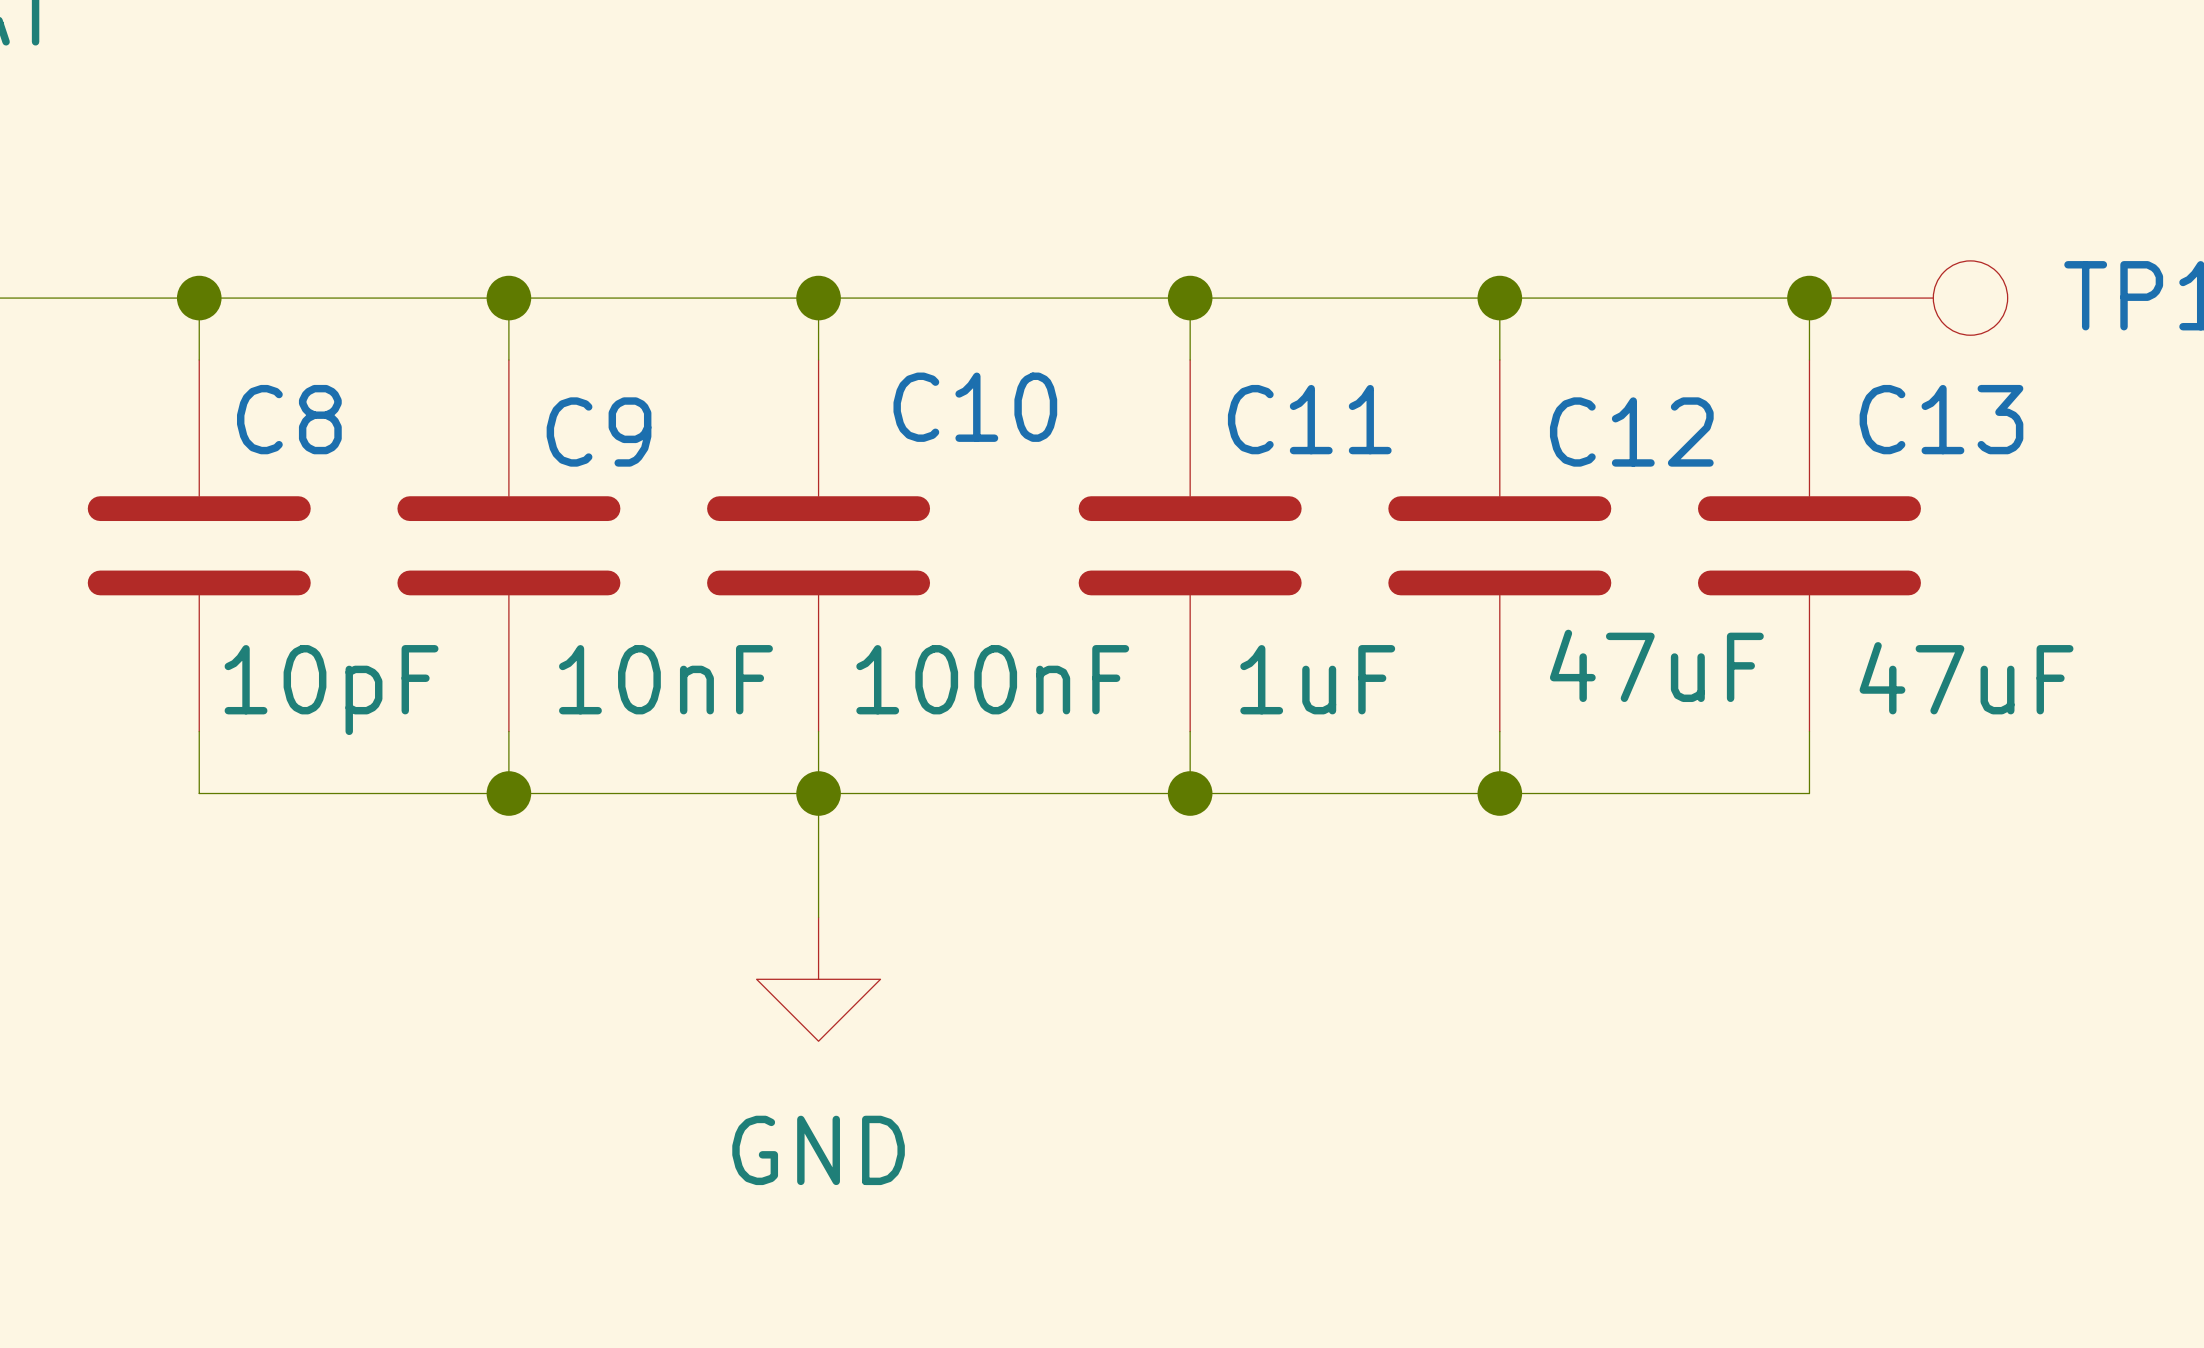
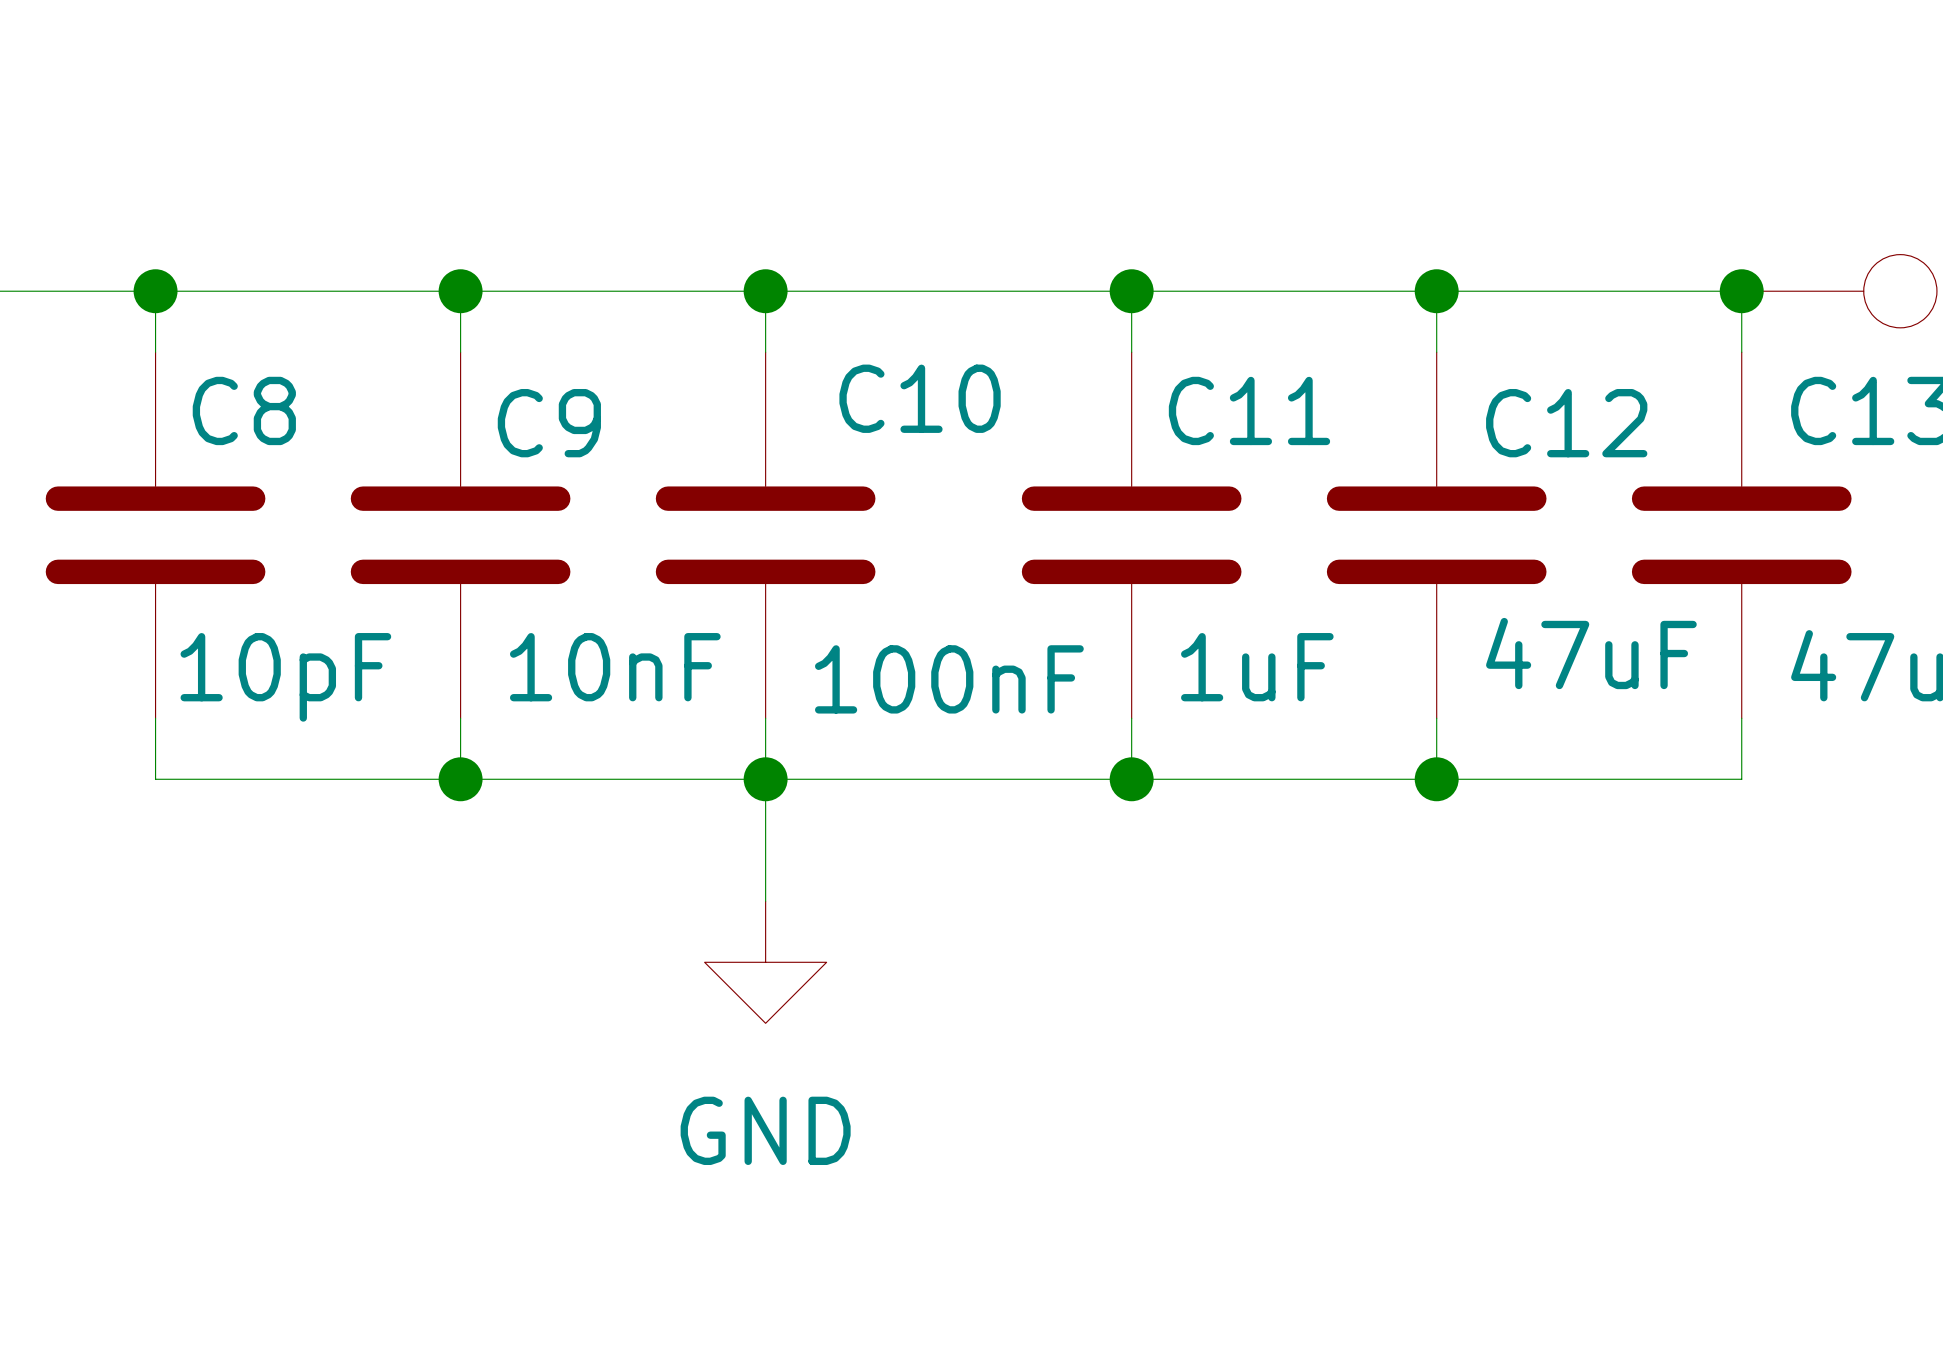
C10 value position: 100nF (992, 679) -> 100nF (949, 679)

